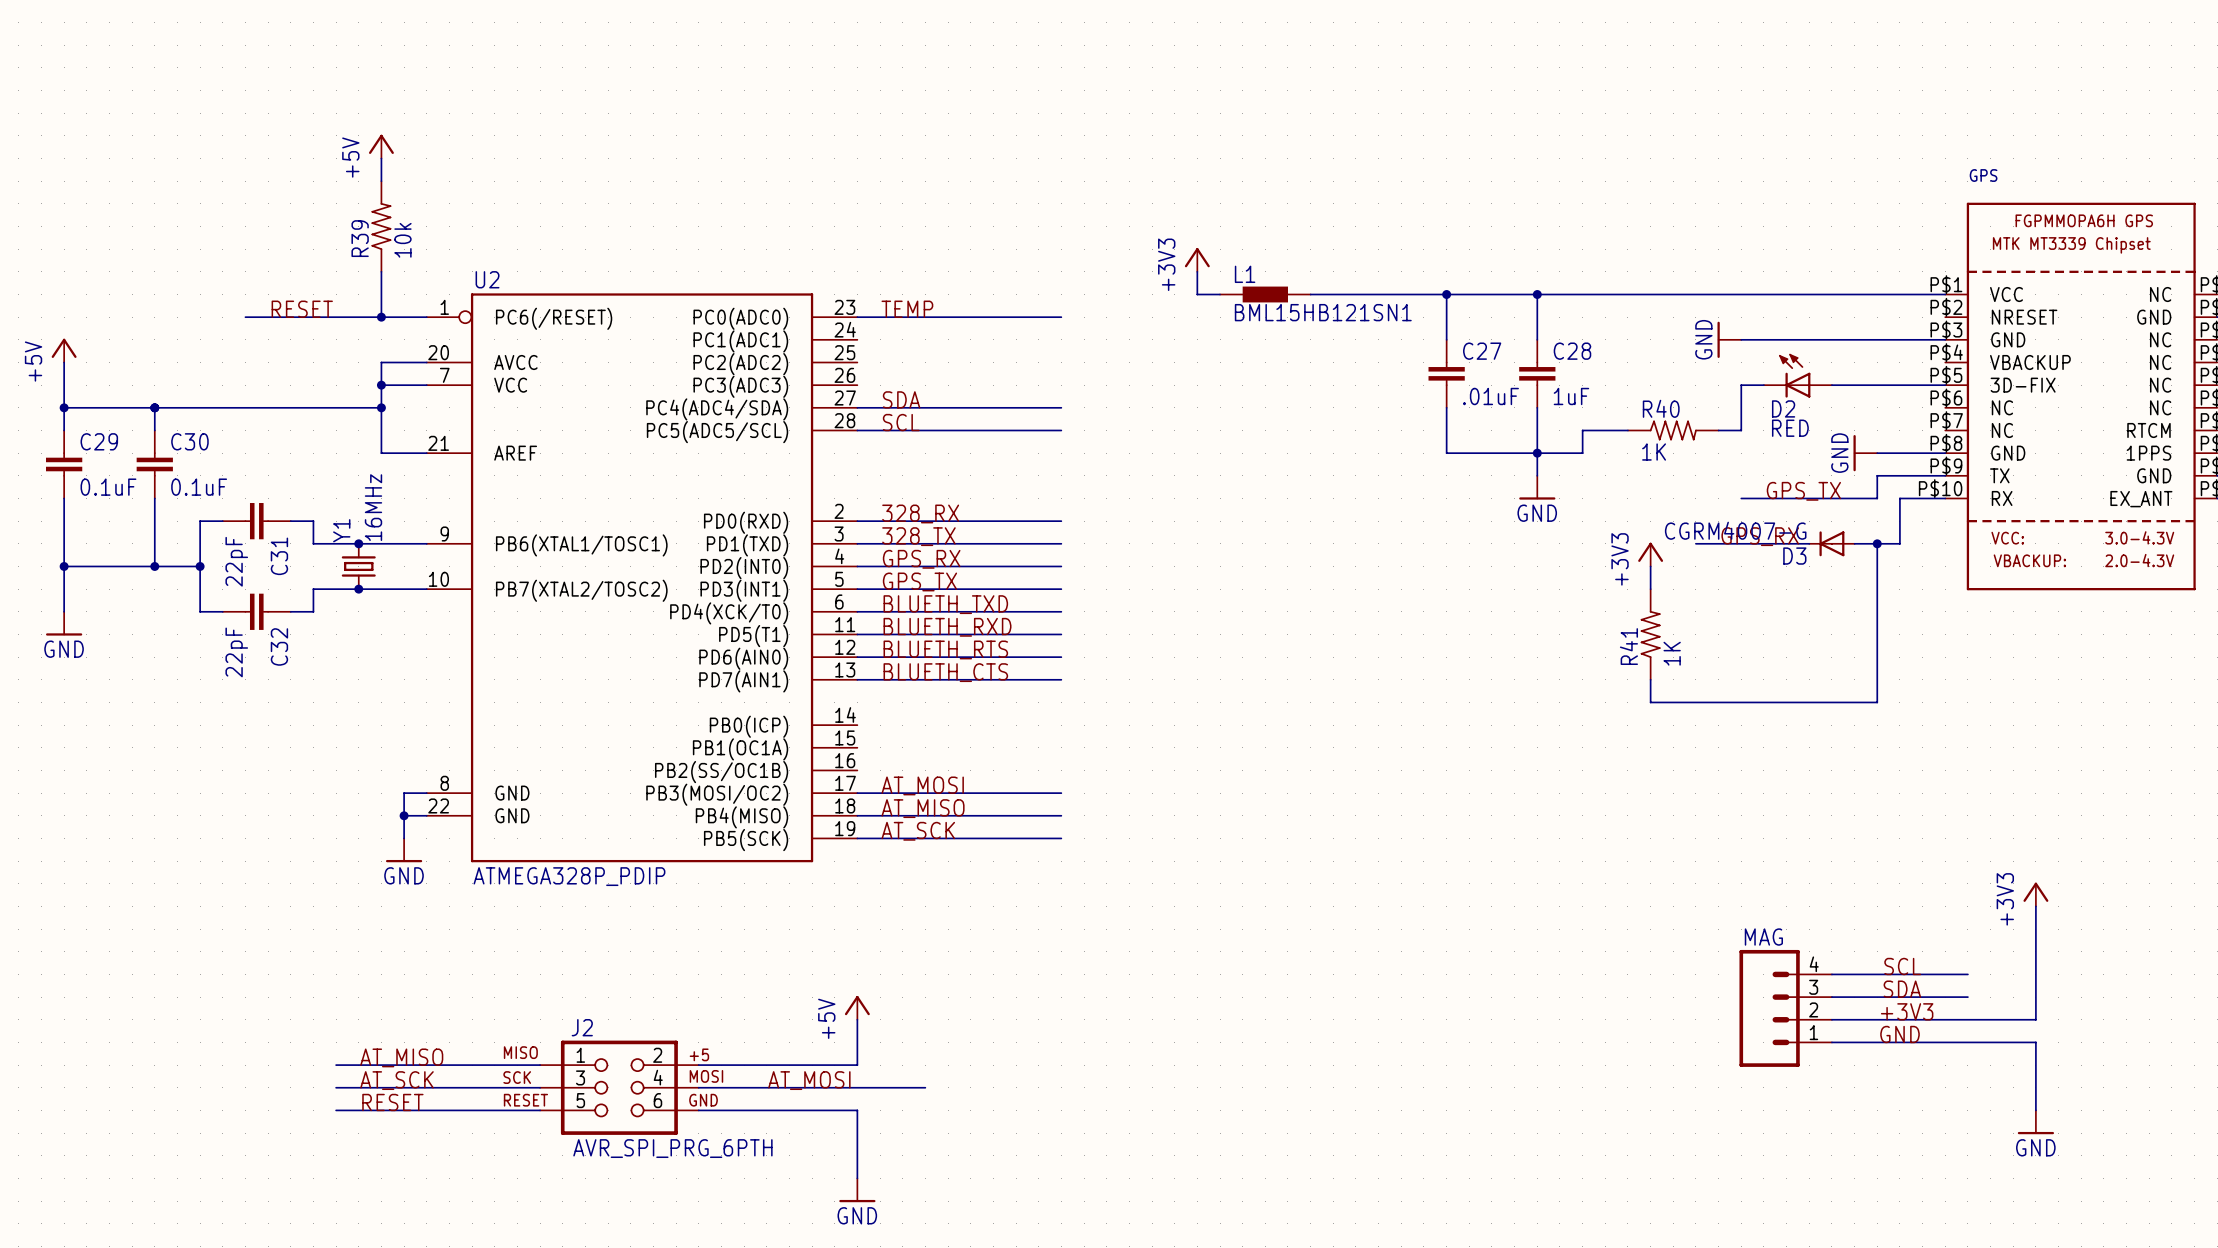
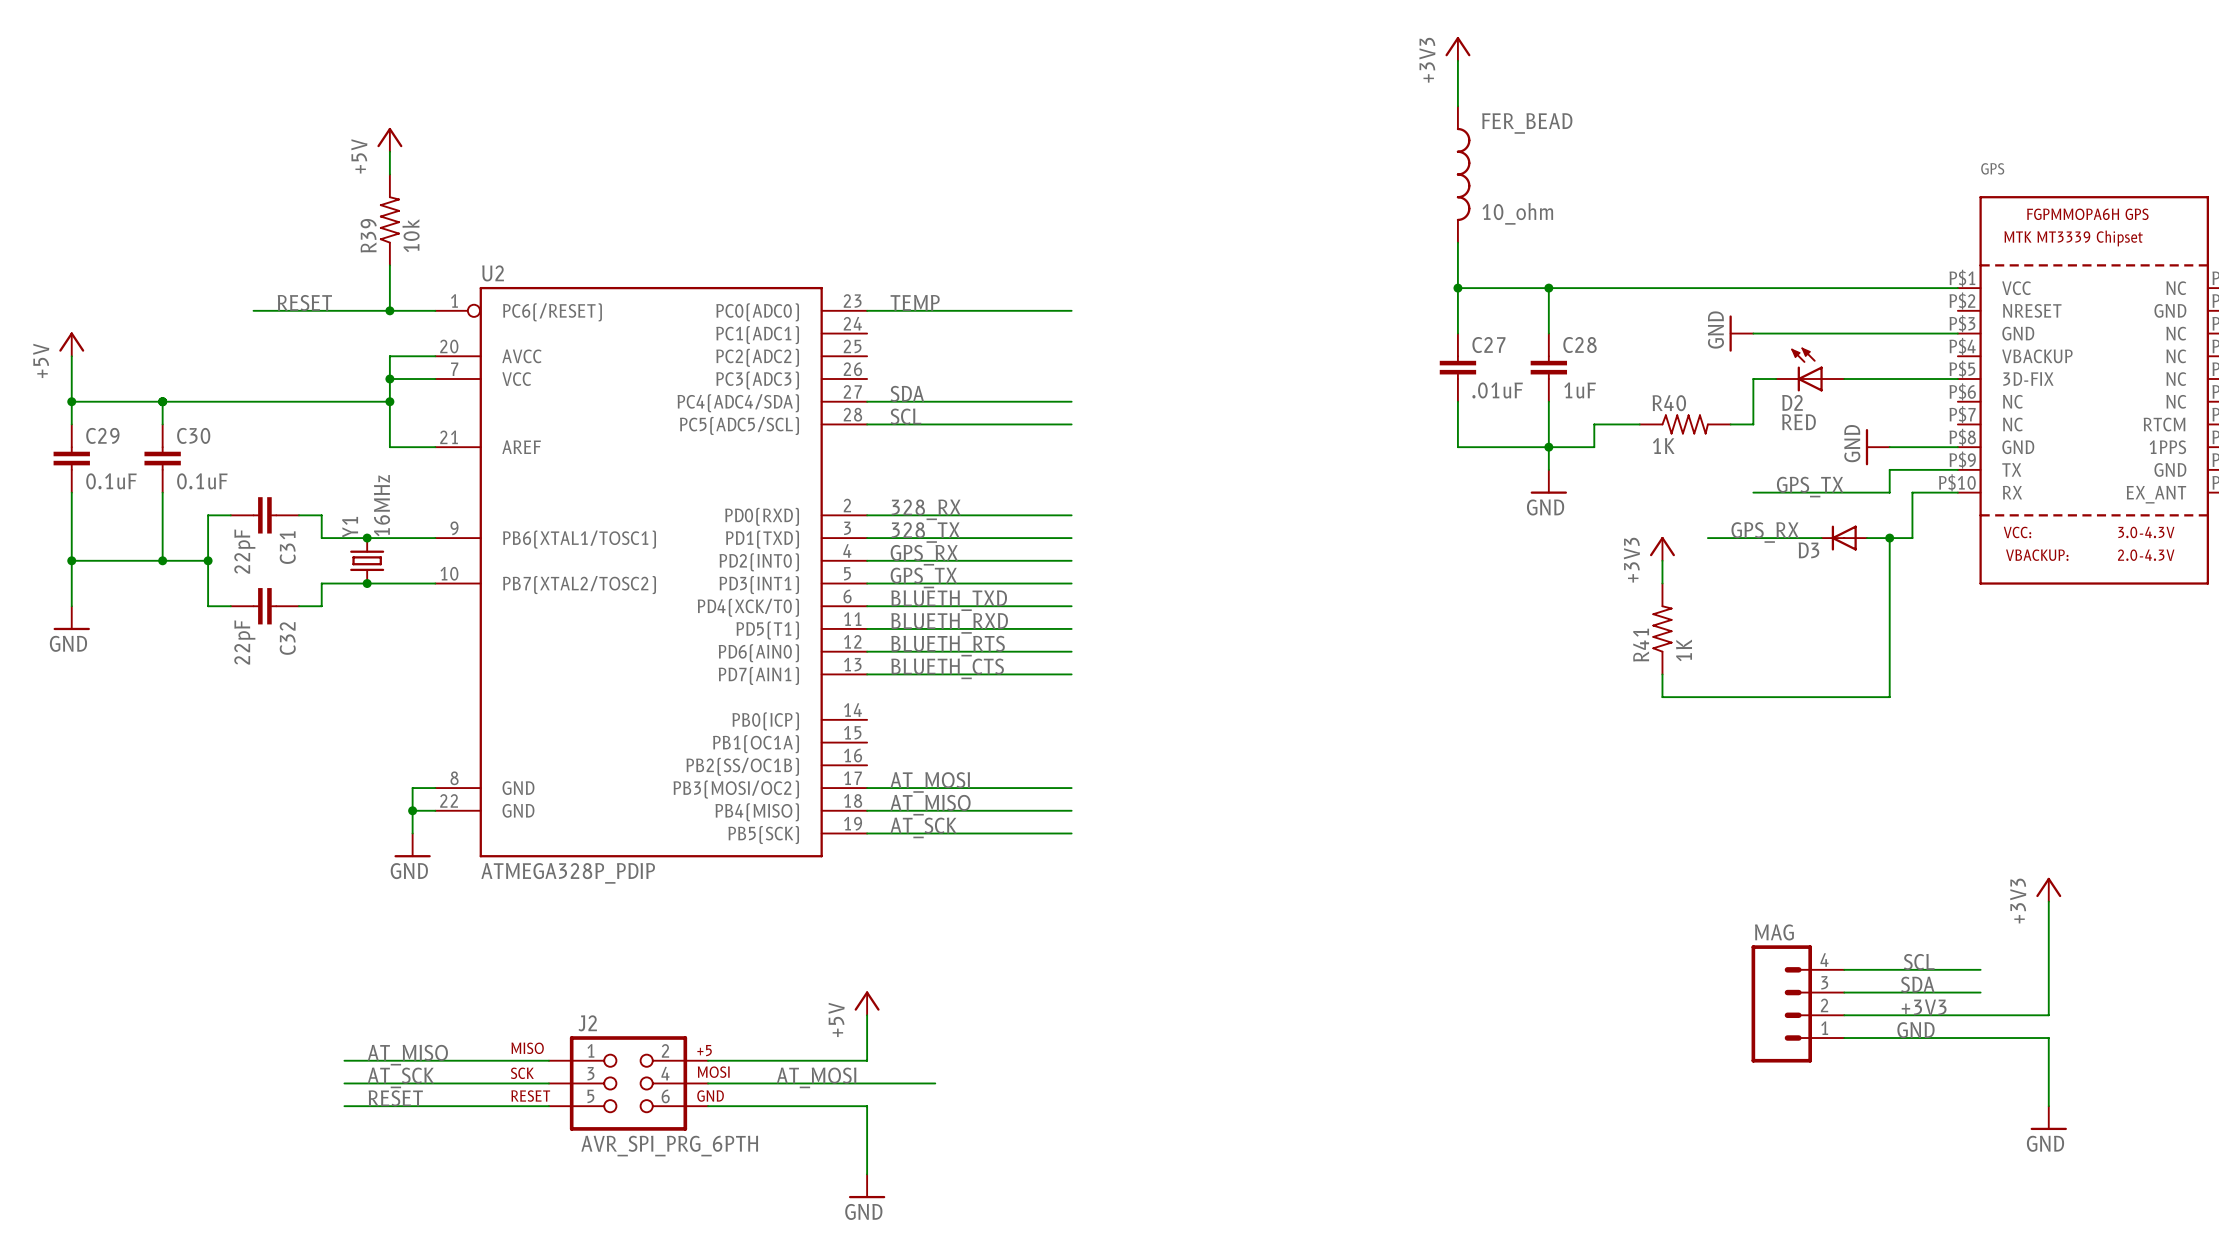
power symbol: none -> +3V3 (1457, 48)
wire: none -> (1457, 60) (1457, 106)
FER_BEAD: none -> 10_ohm (1463, 174)
power symbol: +3V3 (1197, 259) -> none
wire: (1197, 271) (1197, 294) (1220, 294) -> none
L1: BML15HB121SN1 (1265, 294) -> none
wire: (1310, 294) (1446, 294) -> (1457, 242) (1457, 288)
D3 value: CGRM4007-G (1735, 530) -> none

